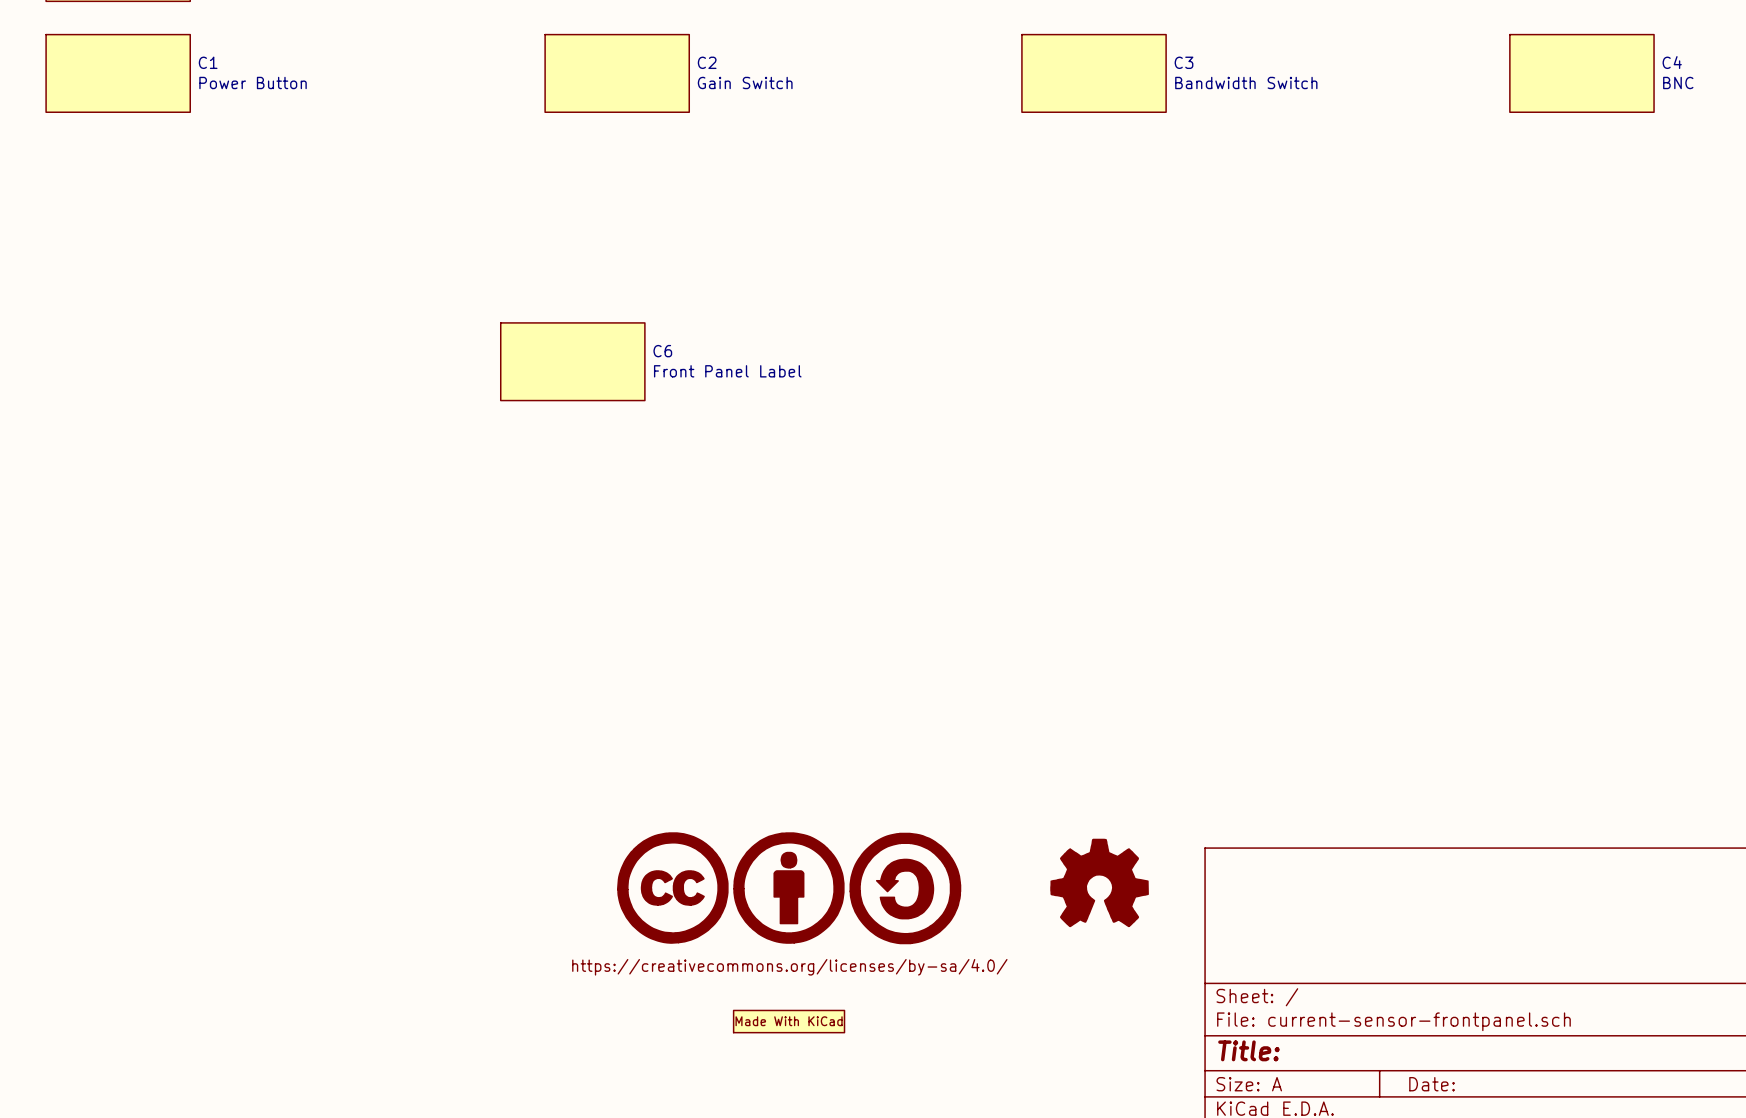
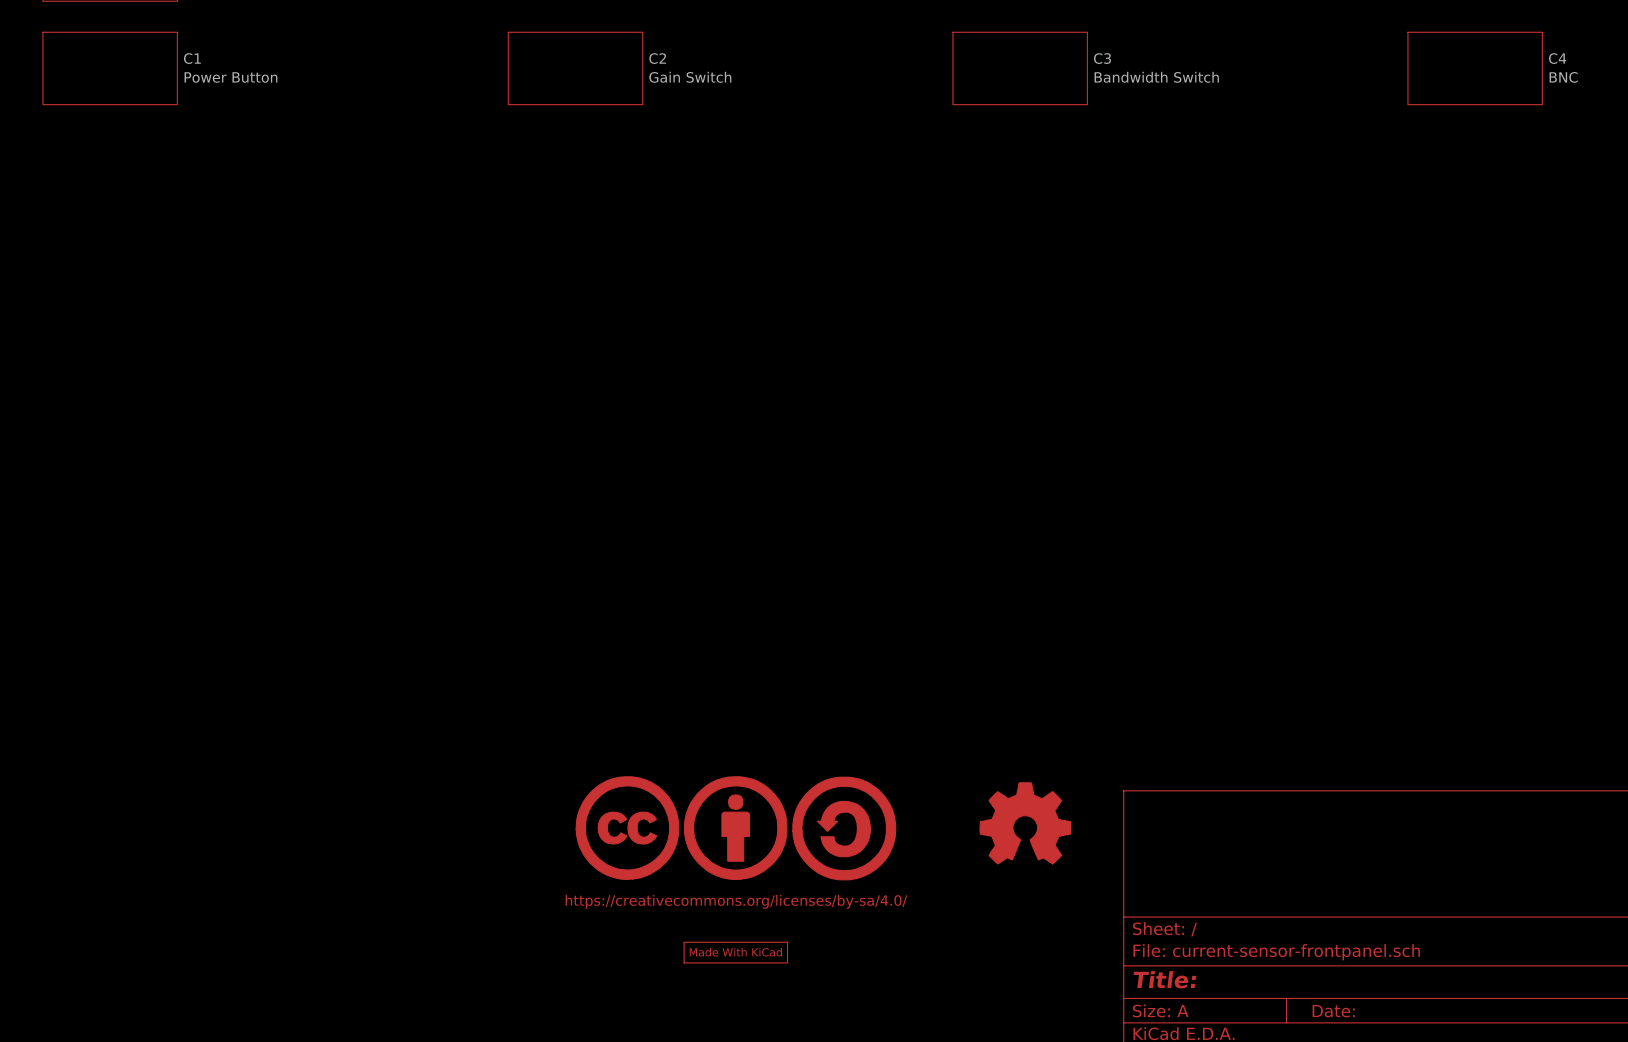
C6: Front Panel Label (572, 361) -> none

